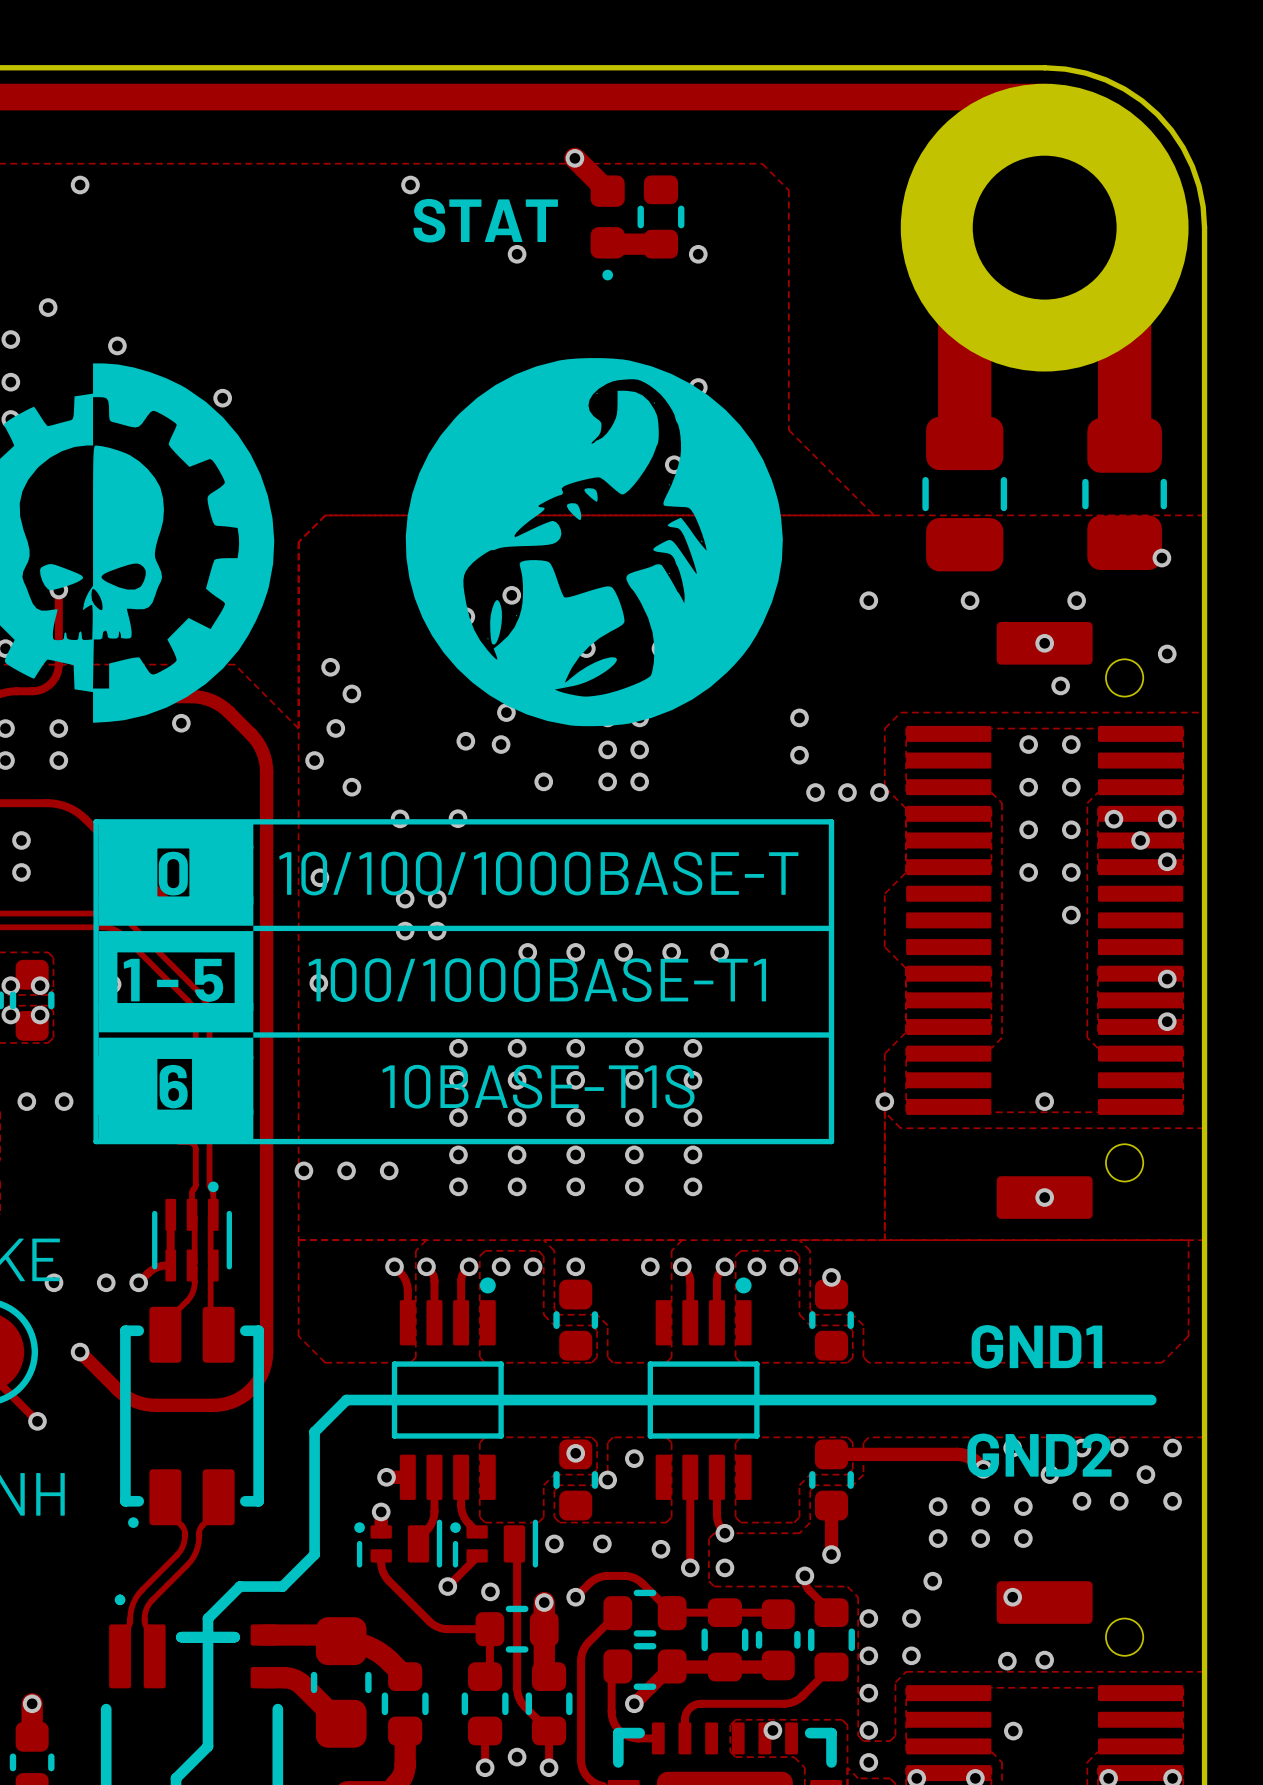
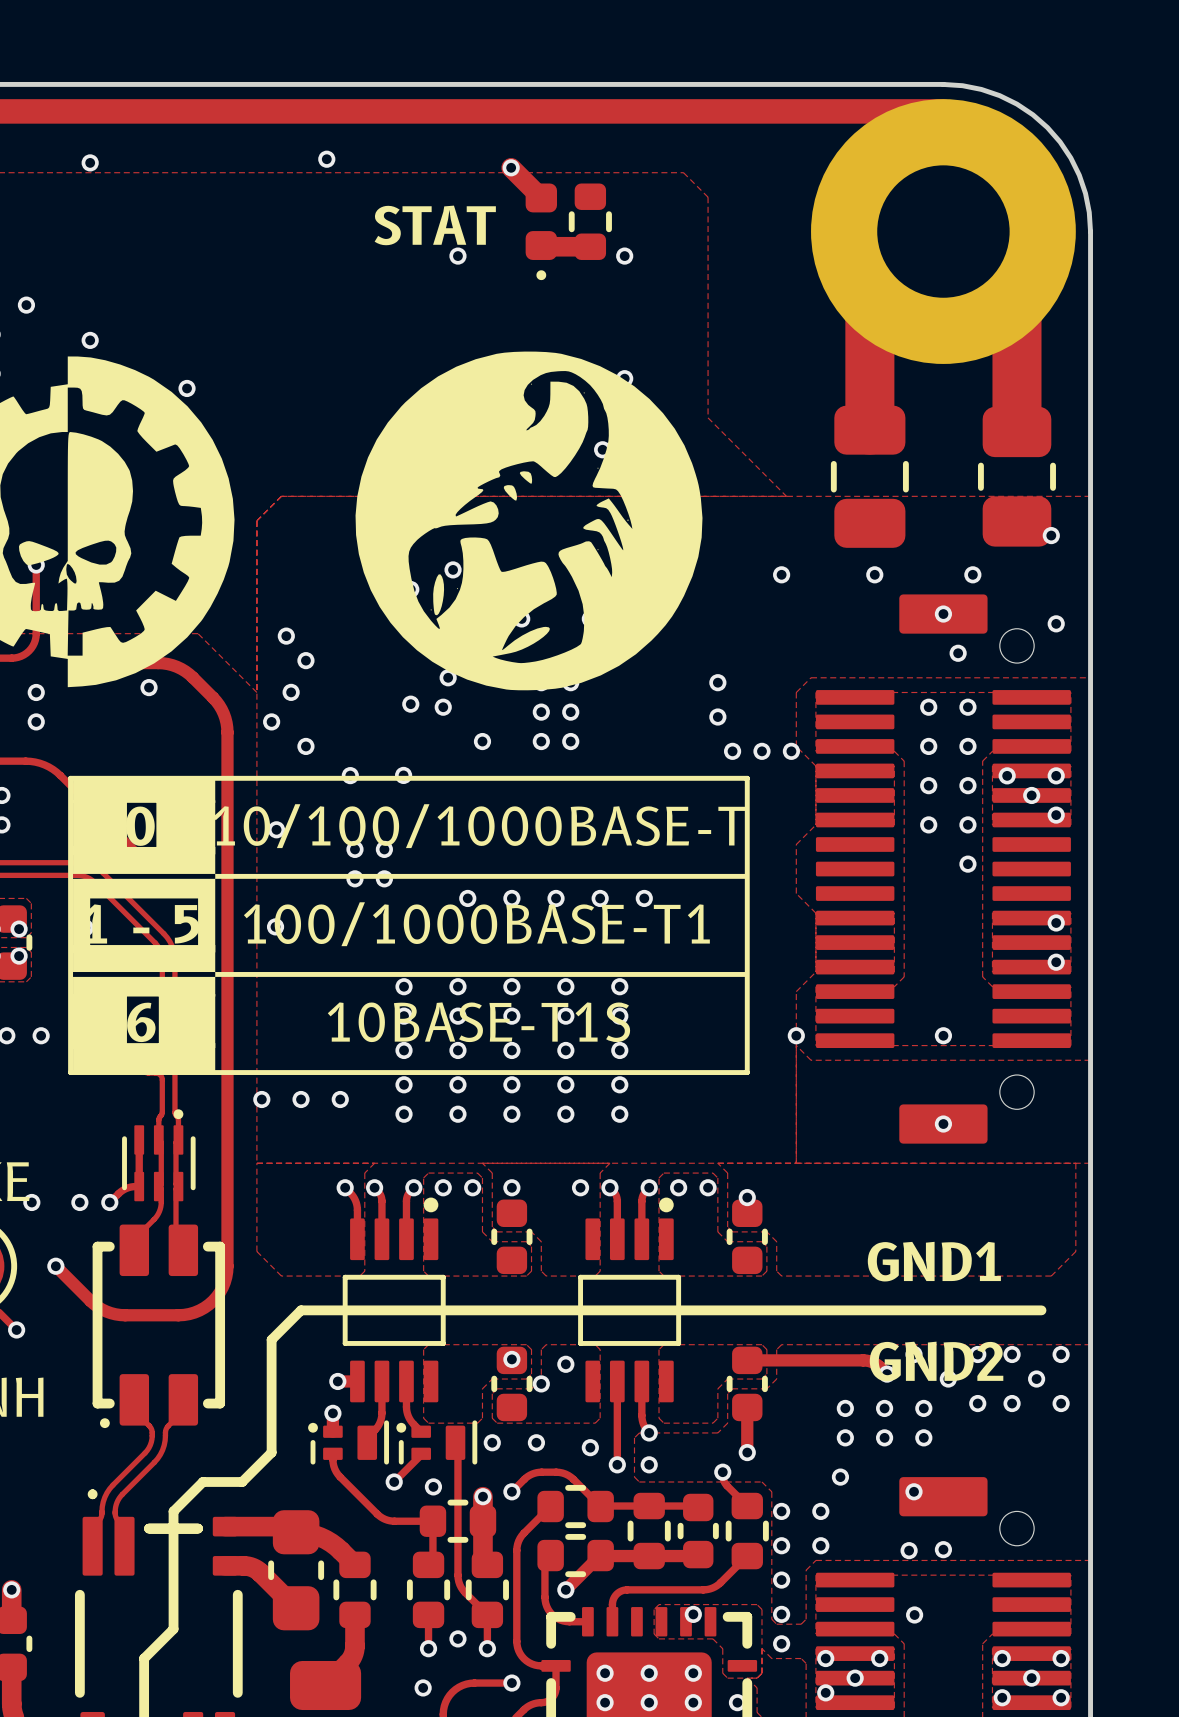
via position: (80, 185) -> (90, 162)
via position: (410, 185) -> (326, 159)

